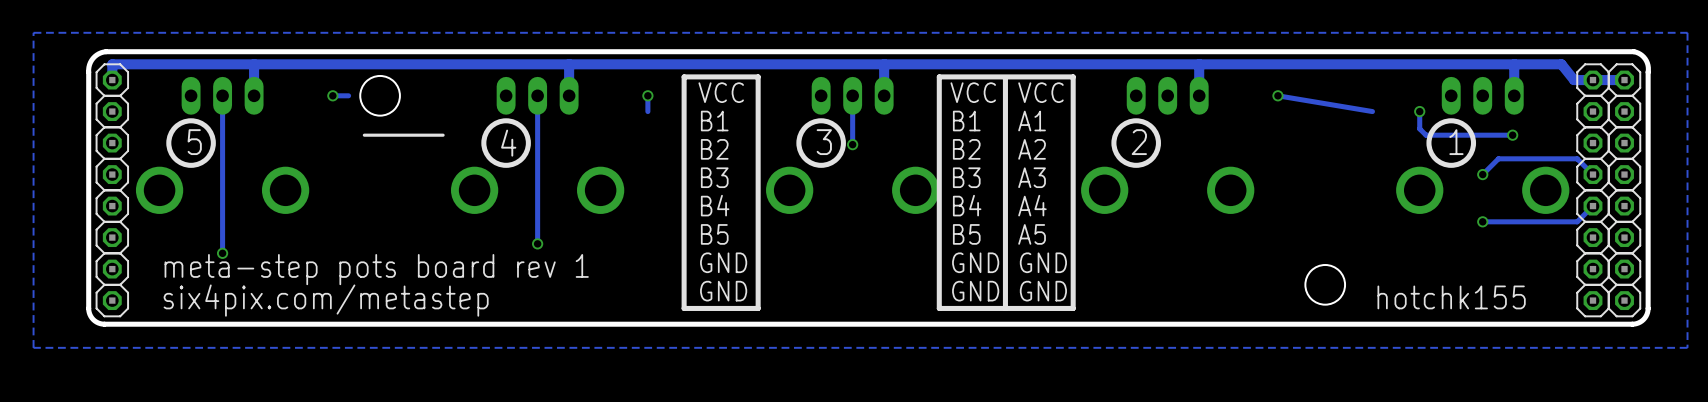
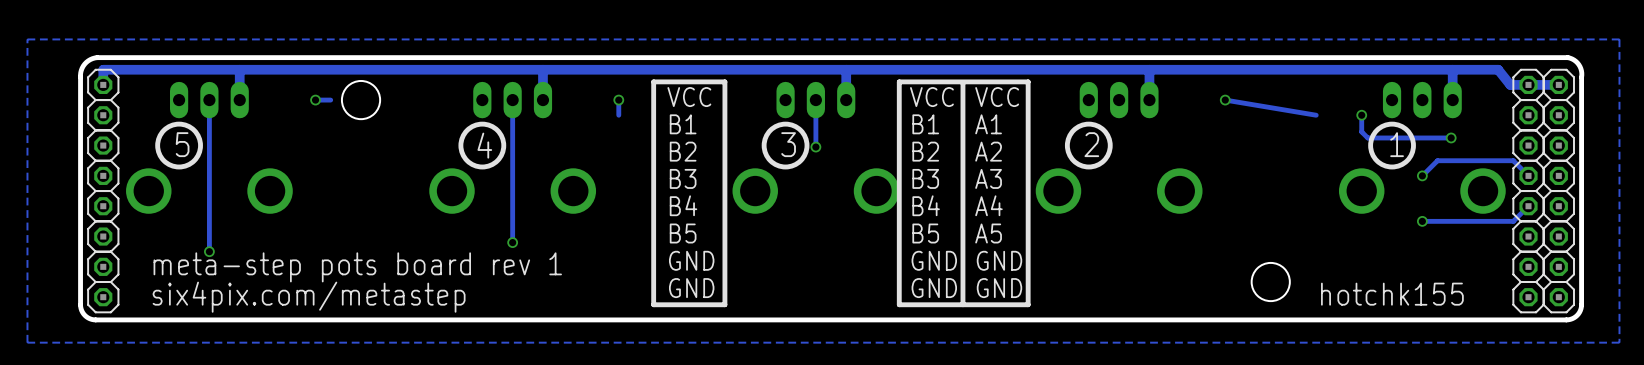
line: (443, 135) (364, 135) -> none

